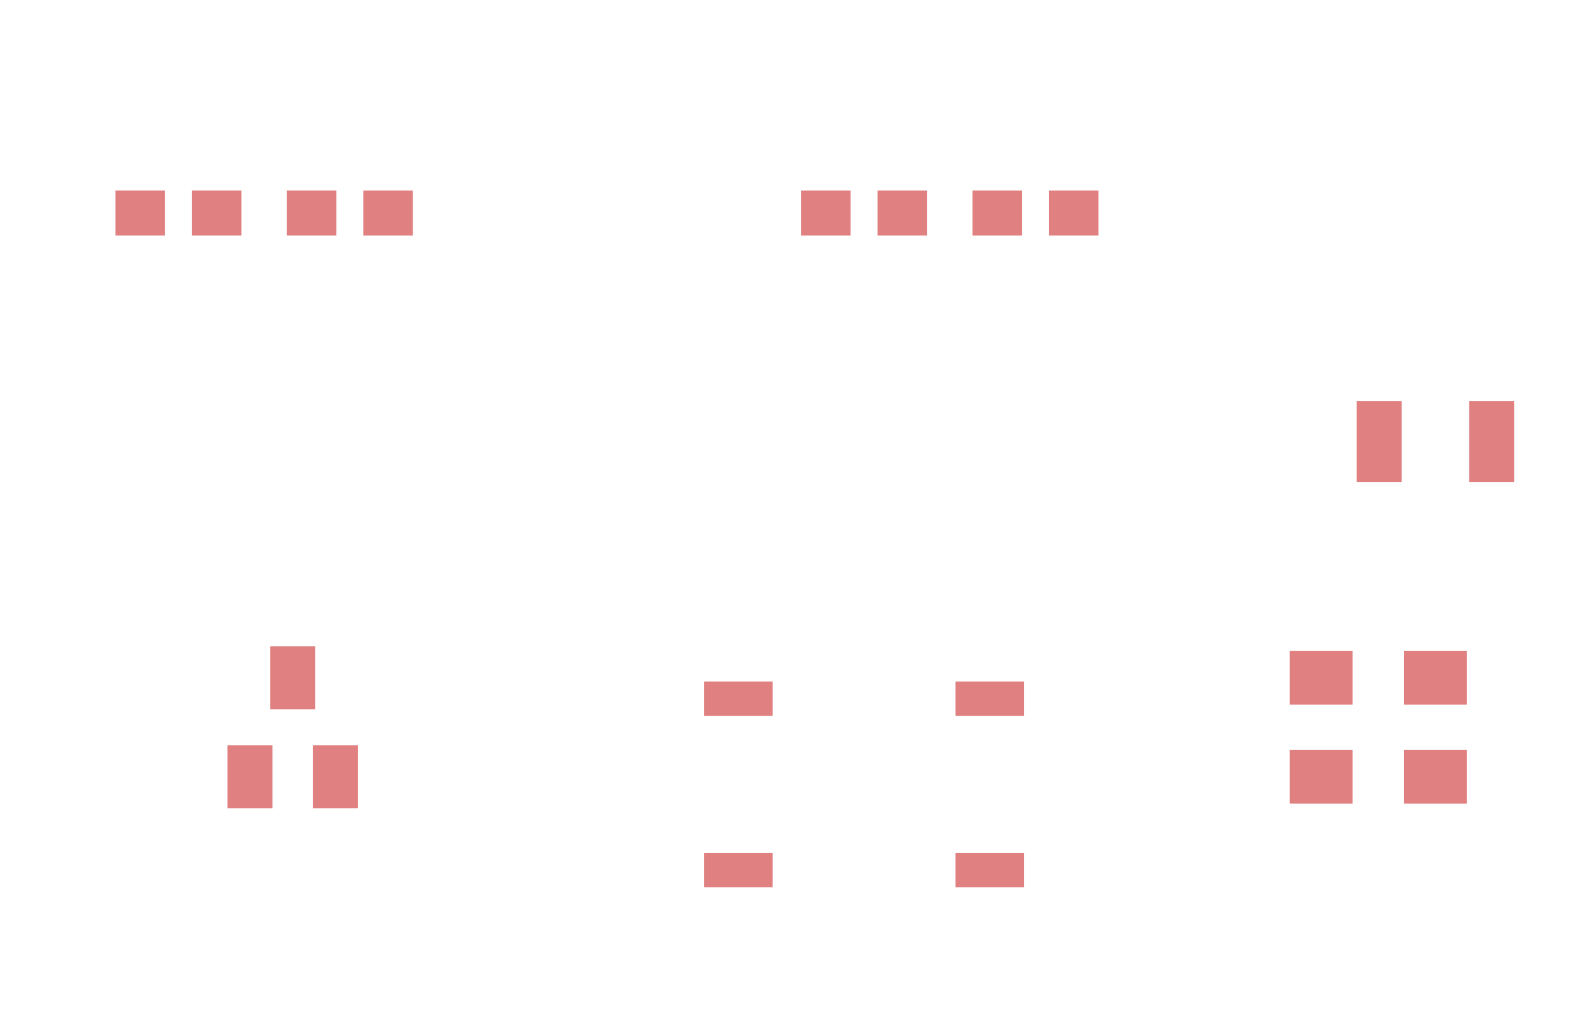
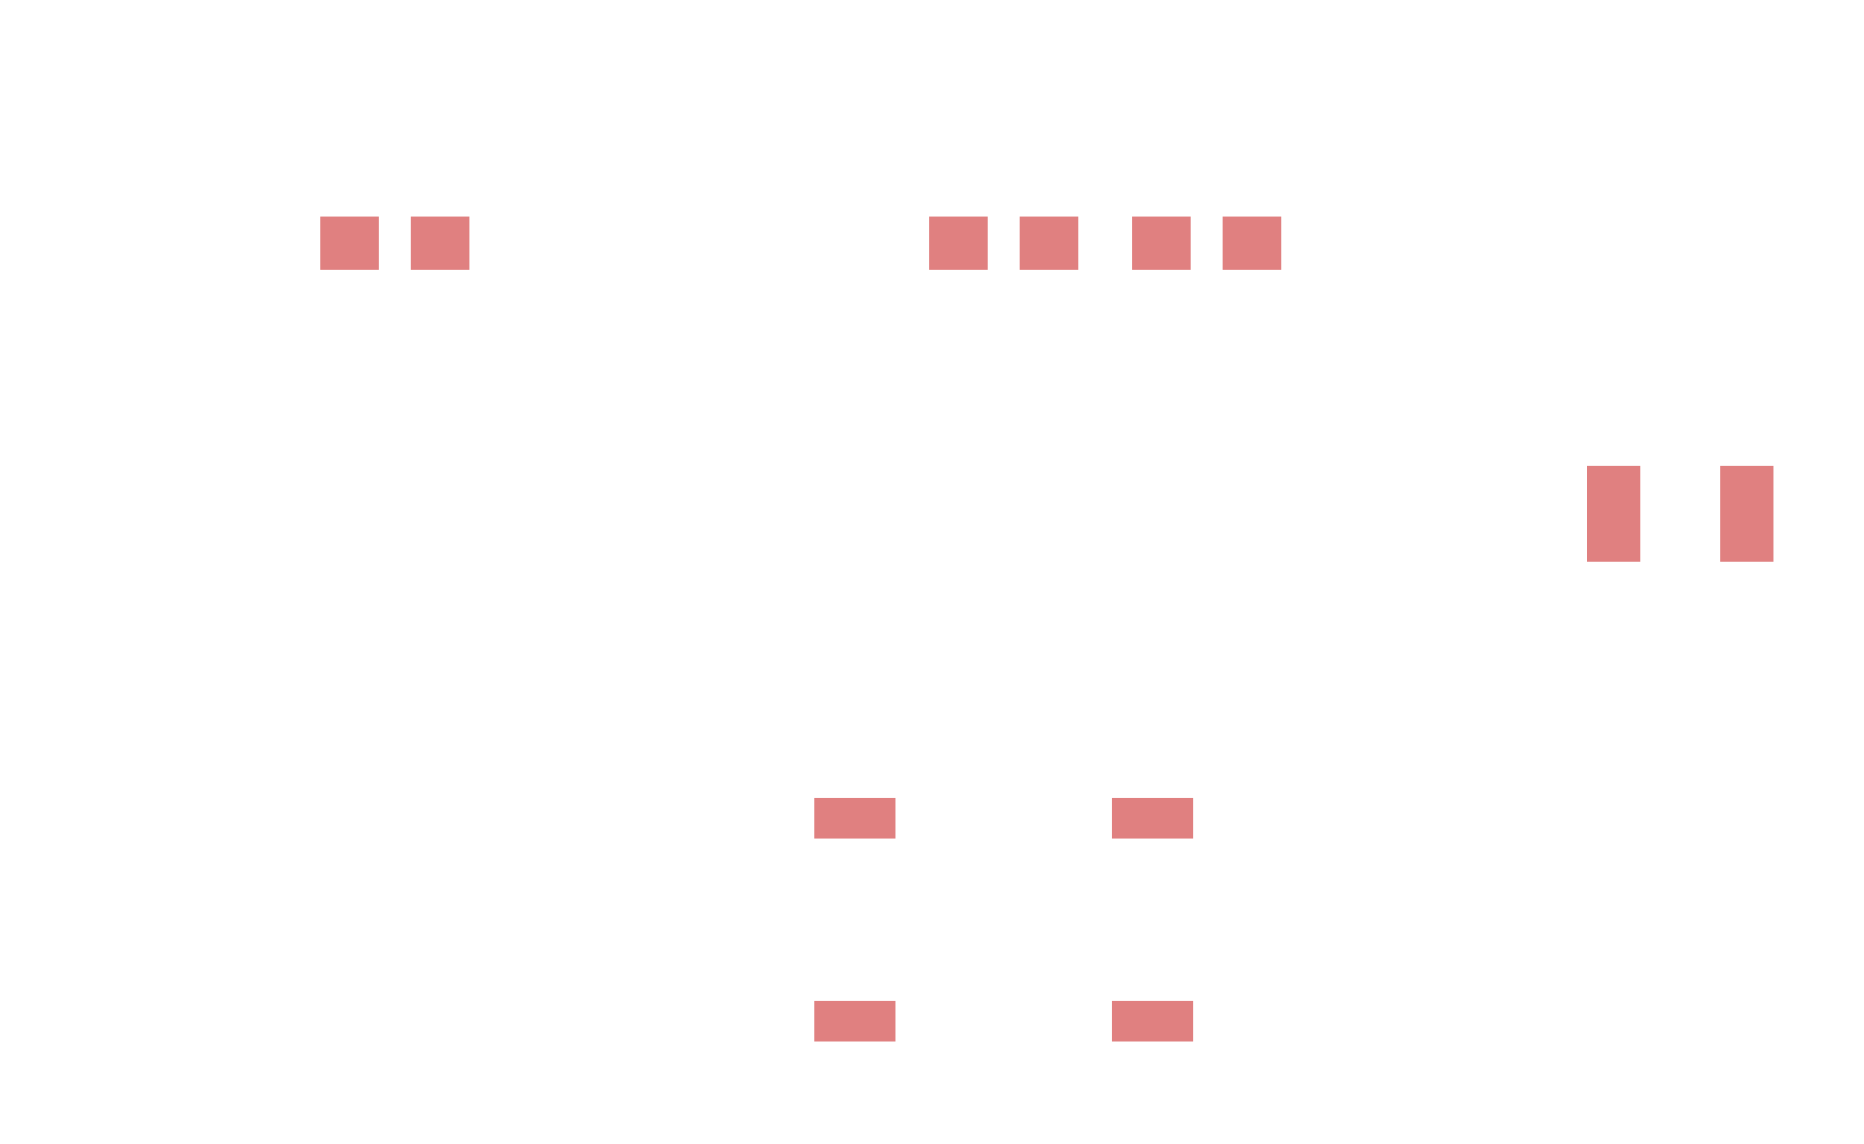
part: (178, 213) -> none
part: (292, 727) -> none
part: (1378, 727) -> none

